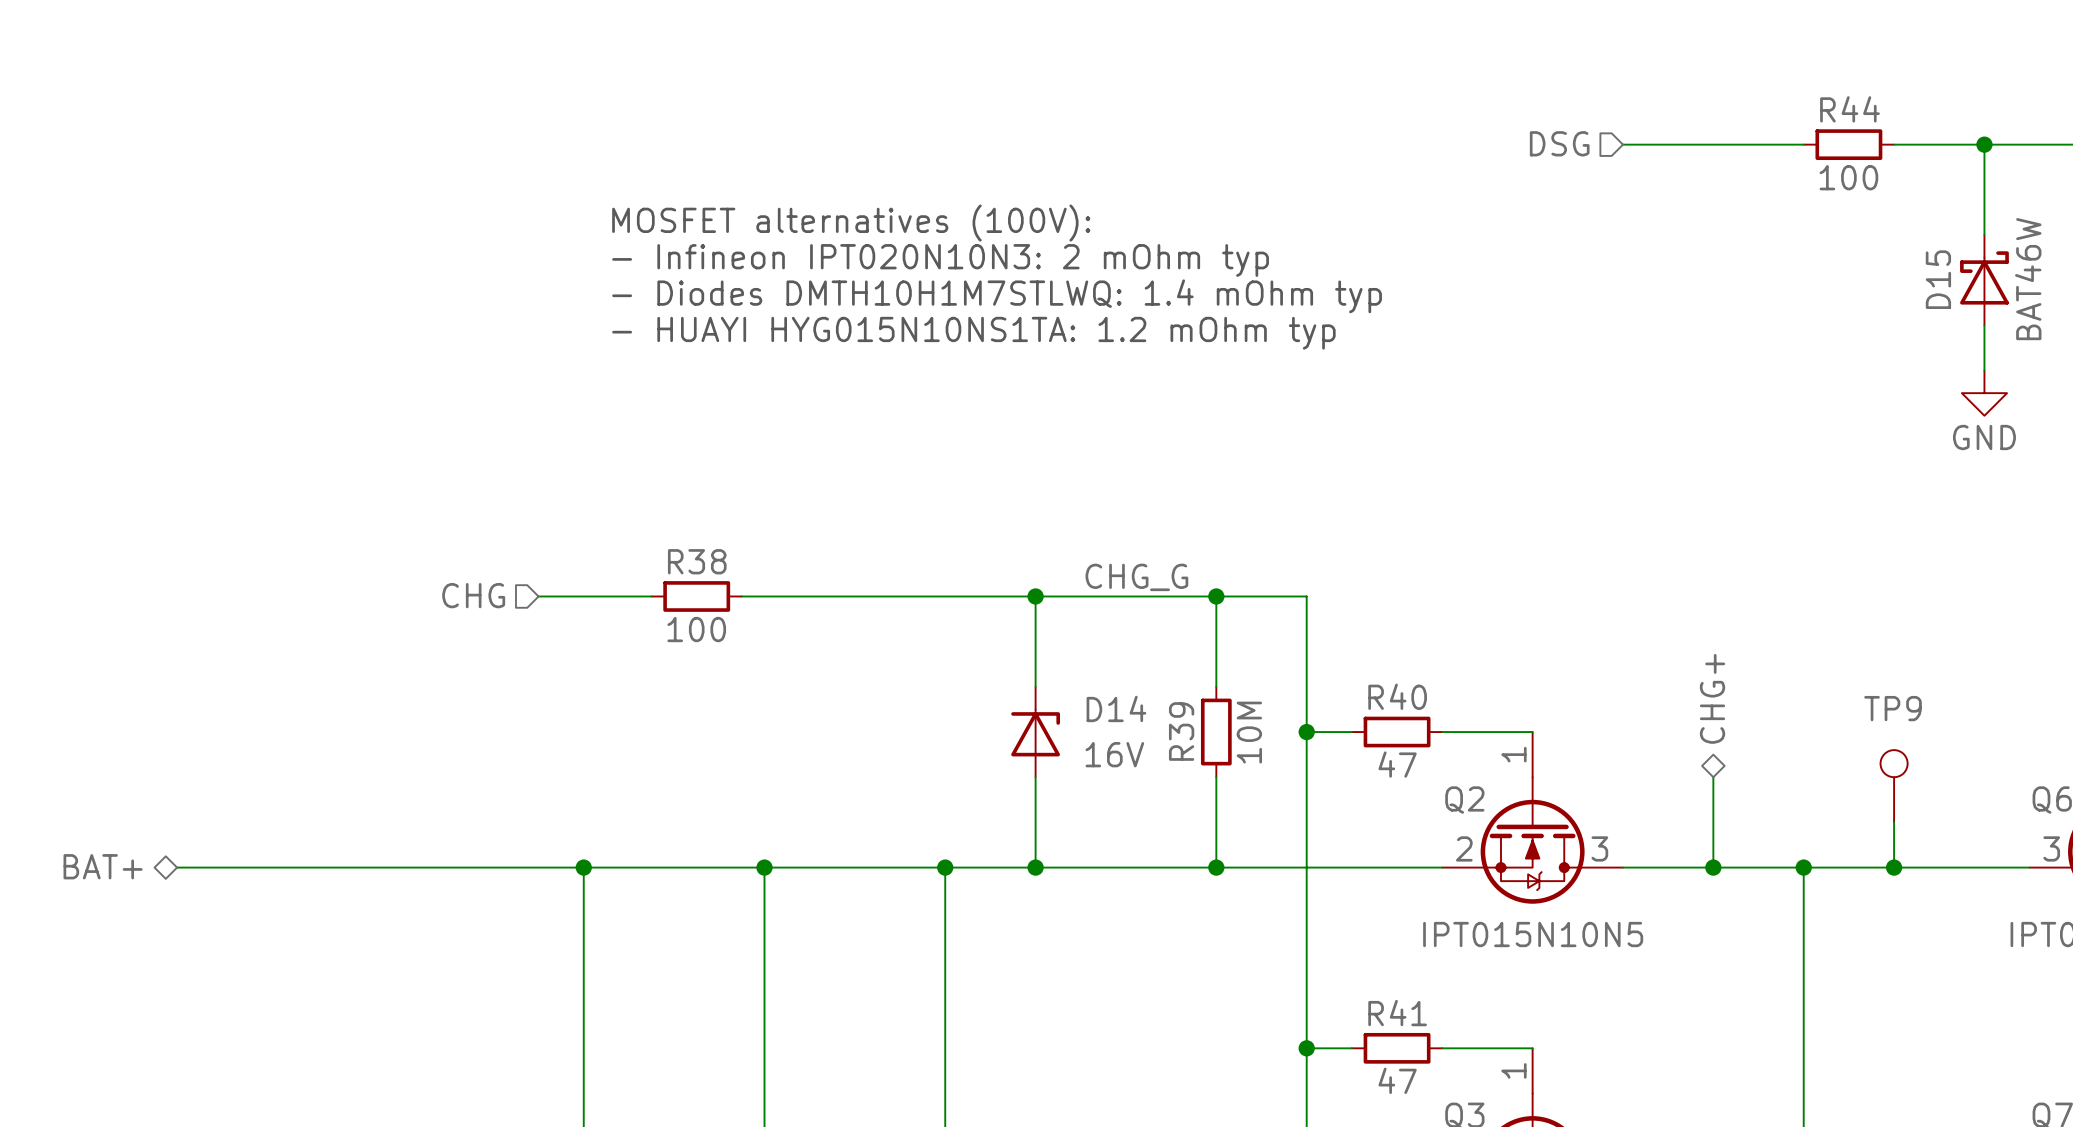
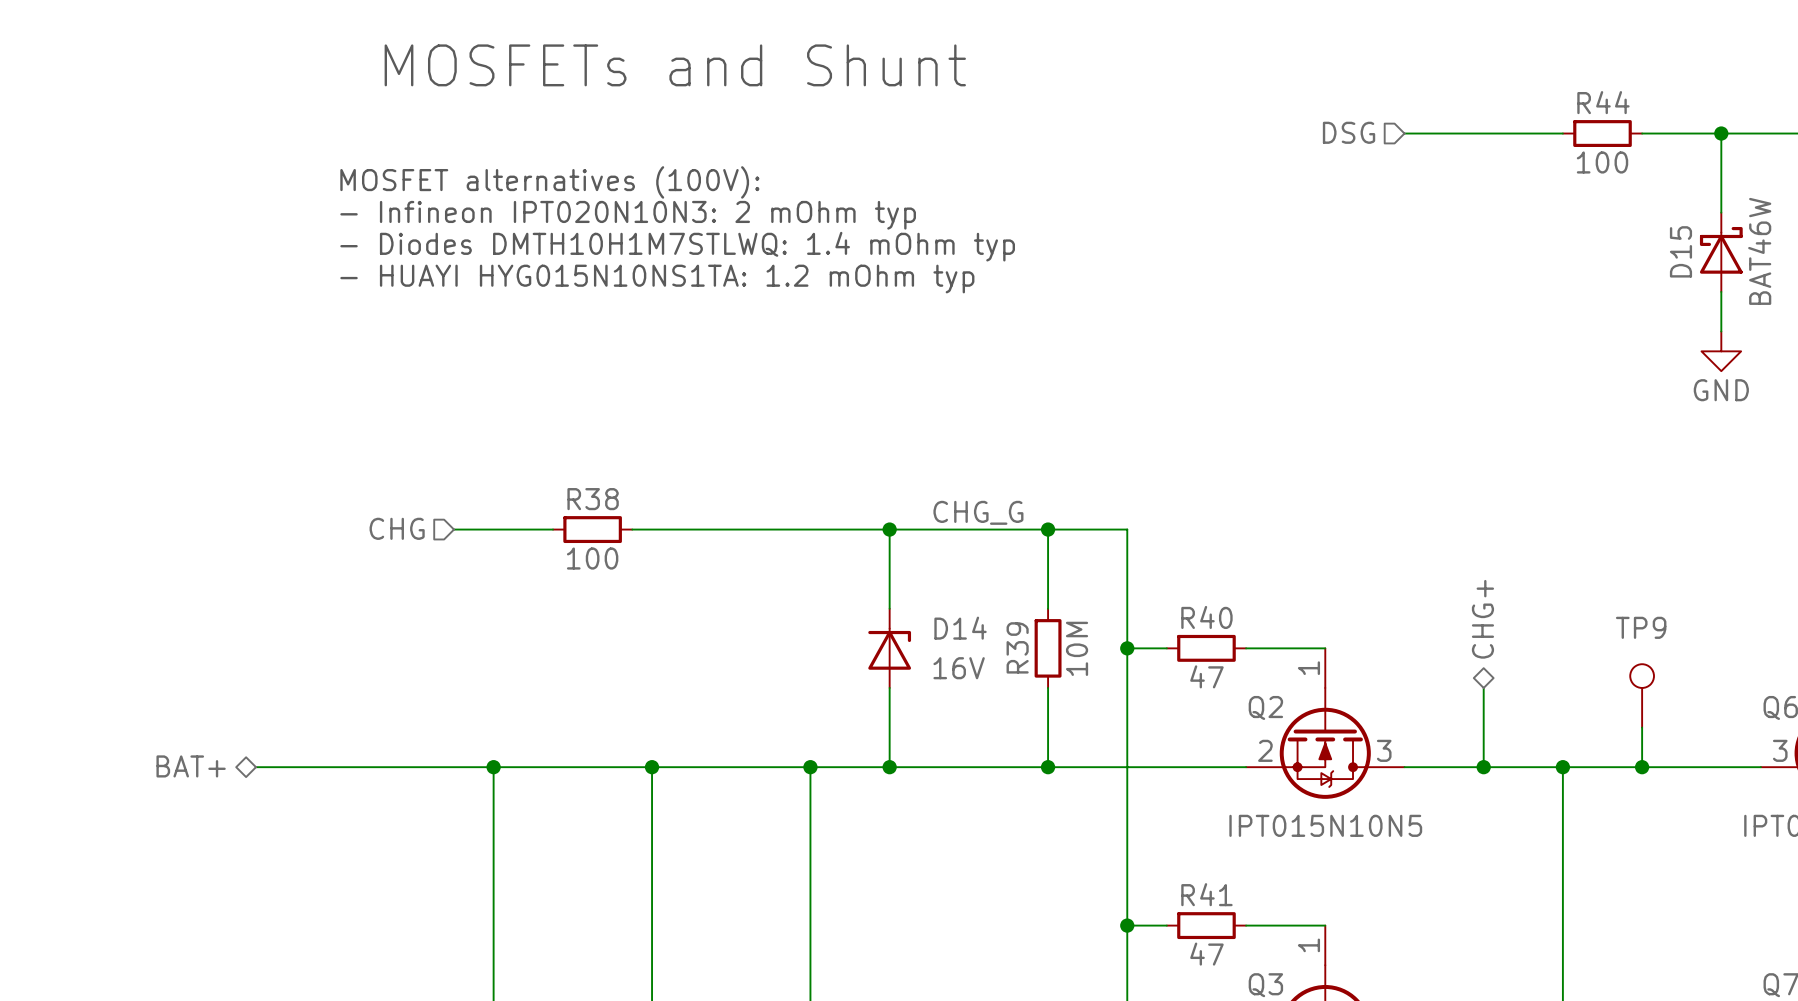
text: none -> MOSFETs and Shunt (675, 65)
text position: MOSFET alternatives (100V): (851, 223) -> MOSFET alternatives (100V): (549, 182)
text position: - Infineon IPT020N10N3: 2 mOhm typ (940, 260) -> - Infineon IPT020N10N3: 2 mOhm typ (628, 215)
text position: - Diodes DMTH10H1M7STLWQ: 1.4 mOhm typ (997, 296) -> - Diodes DMTH10H1M7STLWQ: 1.4 mOhm typ (677, 246)
text position: - HUAYI HYG015N10NS1TA: 1.2 mOhm typ (973, 333) -> - HUAYI HYG015N10NS1TA: 1.2 mOhm typ (657, 279)
hierarchical label position: BAT+ (103, 866) -> BAT+ (191, 766)
wire: (177, 867) (312, 867) -> none

